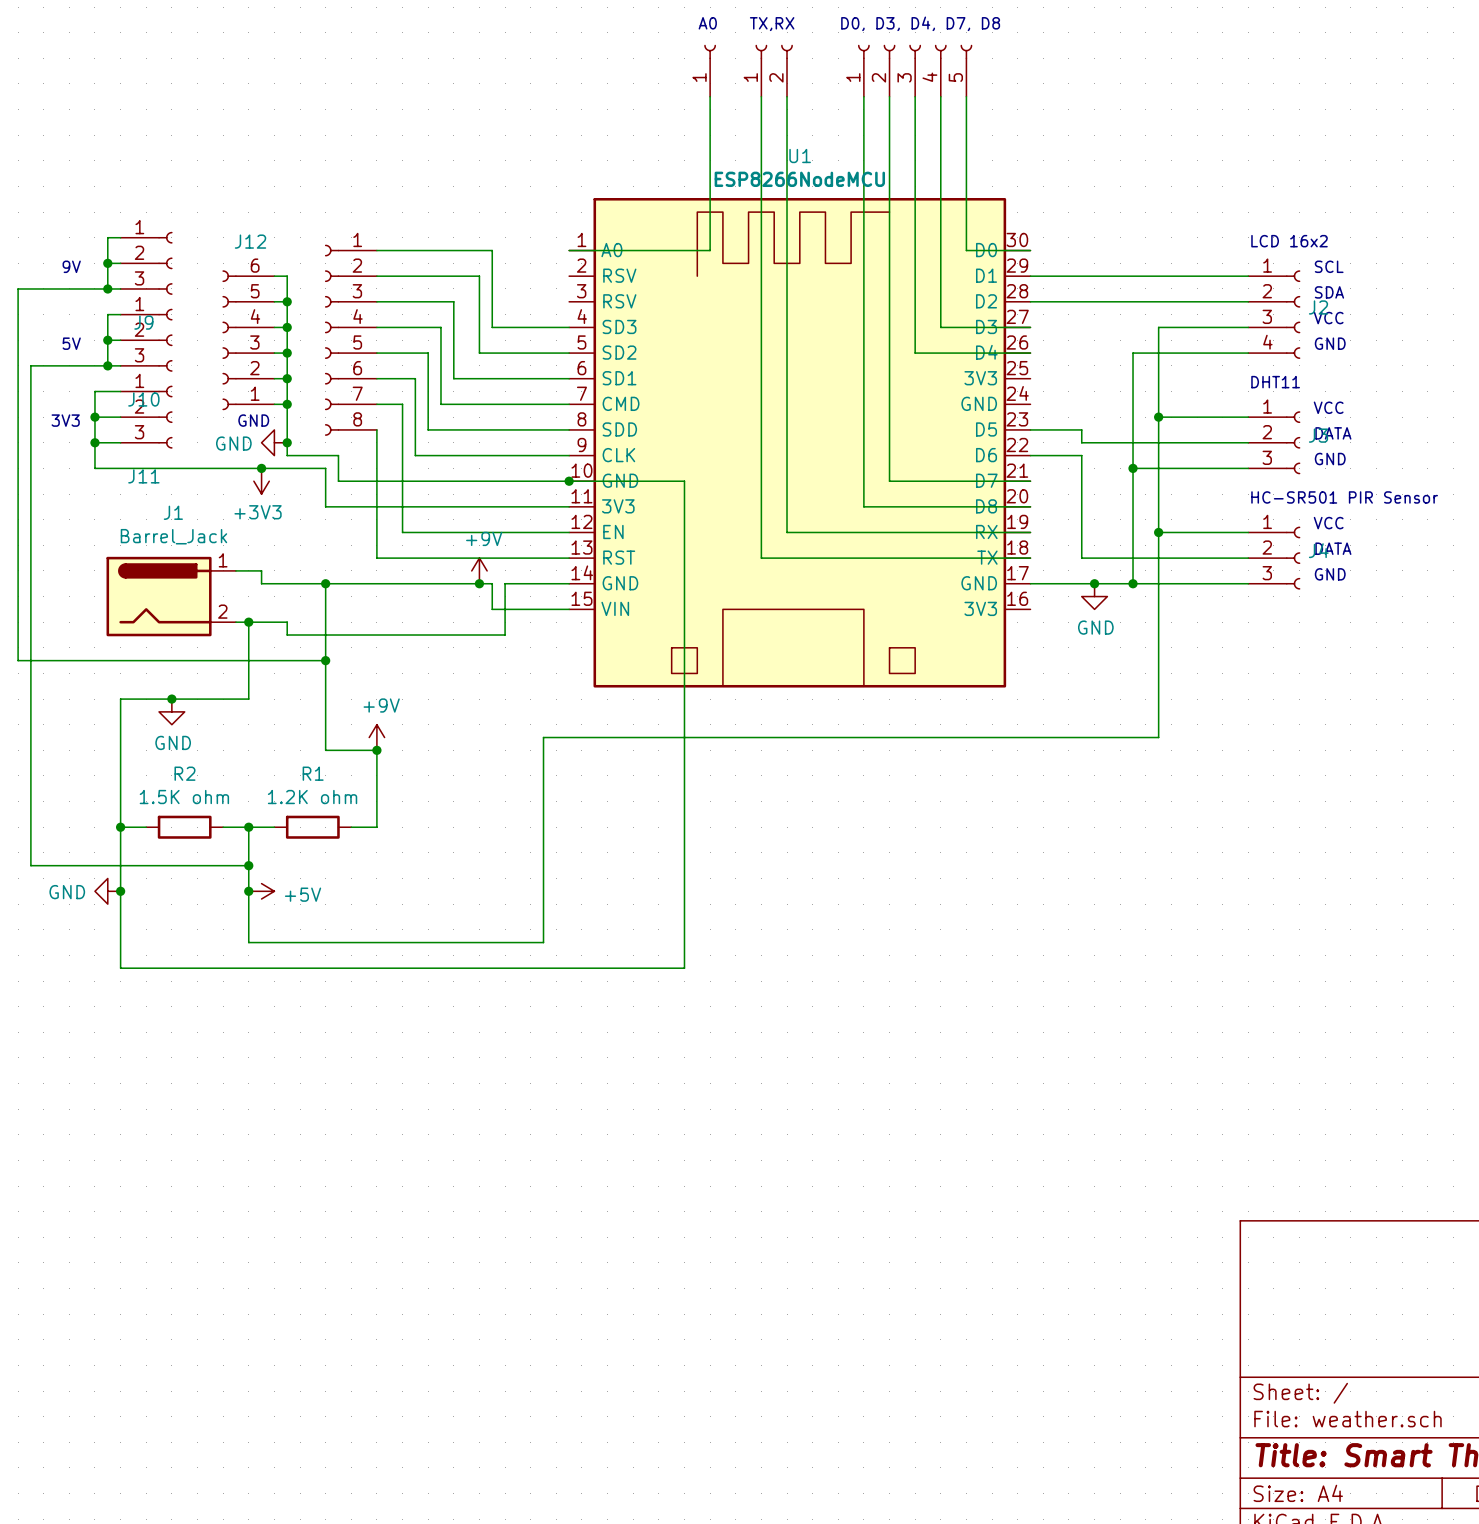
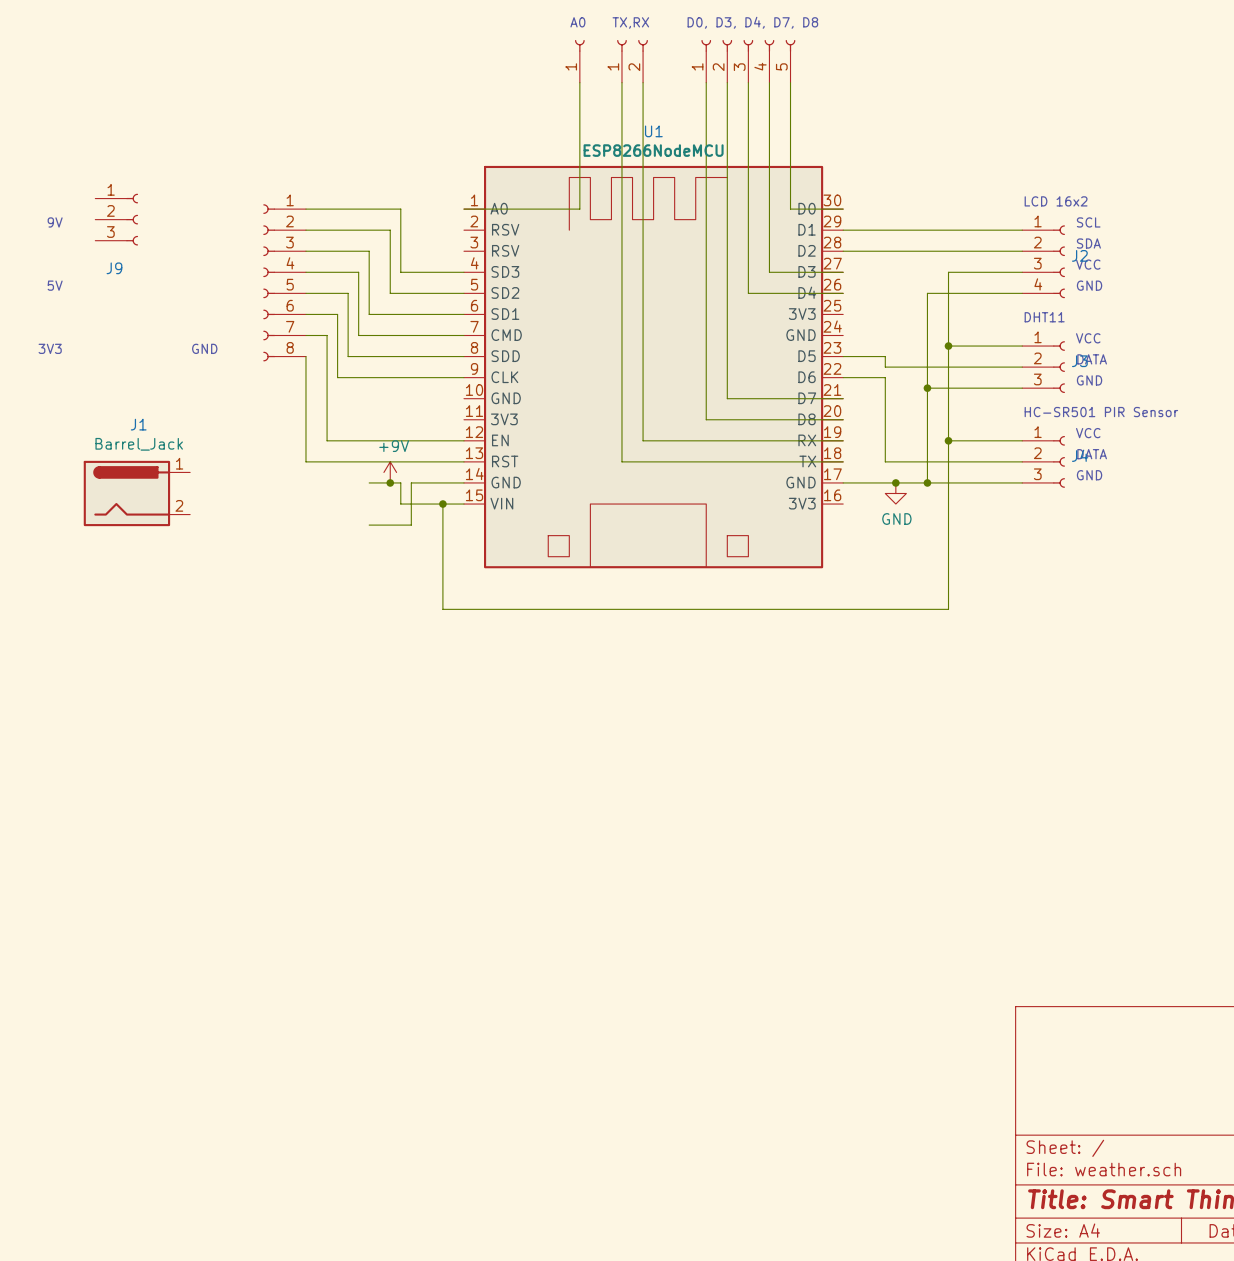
wire: (120, 237) (107, 237) (107, 288) -> none
wire: (107, 263) (120, 263) -> none
junction: (107, 263) -> none
wire: (274, 276) (287, 276) (287, 455) (338, 455) (338, 481) (684, 481) (684, 968) (120, 968) (120, 699) (248, 699) (248, 622) -> none
junction: (107, 288) -> none
wire: (120, 288) (18, 288) (18, 660) (325, 660) -> none
wire: (274, 301) (287, 301) -> none
junction: (287, 301) -> none
wire: (120, 314) (107, 314) (107, 365) -> none
wire: (274, 327) (287, 327) -> none
junction: (287, 327) -> none
wire: (107, 340) (120, 340) -> none
junction: (107, 340) -> none
J10: (146, 340) -> none
J12: (248, 340) -> none
wire: (274, 353) (287, 353) -> none
junction: (287, 353) -> none
junction: (107, 365) -> none
wire: (120, 365) (30, 365) (30, 865) (248, 865) -> none
wire: (274, 378) (287, 378) -> none
junction: (287, 378) -> none
wire: (120, 391) (94, 391) (94, 468) (325, 468) (325, 506) (569, 506) -> none
wire: (274, 404) (287, 404) -> none
junction: (287, 404) -> none
wire: (94, 417) (120, 417) -> none
junction: (94, 417) -> none
J11: (146, 417) -> none
wire: (94, 442) (120, 442) -> none
junction: (94, 442) -> none
power symbol: GND (274, 442) -> none
junction: (287, 442) -> none
junction: (261, 468) -> none
power symbol: +3V3 (261, 481) -> none
junction: (569, 481) -> none
wire: (235, 570) (261, 570) (261, 583) (453, 583) -> none
wire: (325, 583) (325, 750) (376, 750) (376, 827) (351, 827) -> none
junction: (325, 583) -> none
junction: none -> (442, 504)
wire: (235, 622) (287, 622) (287, 635) (453, 635) -> none
junction: (248, 622) -> none
junction: (325, 660) -> none
junction: (171, 699) -> none
power symbol: GND (171, 711) -> none
power symbol: +9V (376, 737) -> none
wire: (543, 737) (543, 942) (248, 942) (248, 827) -> (442, 609) (442, 504)
junction: (376, 750) -> none
wire: (120, 827) (146, 827) -> none
junction: (120, 827) -> none
R2: 1.5K ohm (184, 827) -> none
wire: (223, 827) (274, 827) -> none
junction: (248, 827) -> none
R1: 1.2K ohm (312, 827) -> none
junction: (248, 865) -> none
power symbol: GND (107, 891) -> none
junction: (120, 891) -> none
junction: (248, 891) -> none
power symbol: +5V (261, 891) -> none

